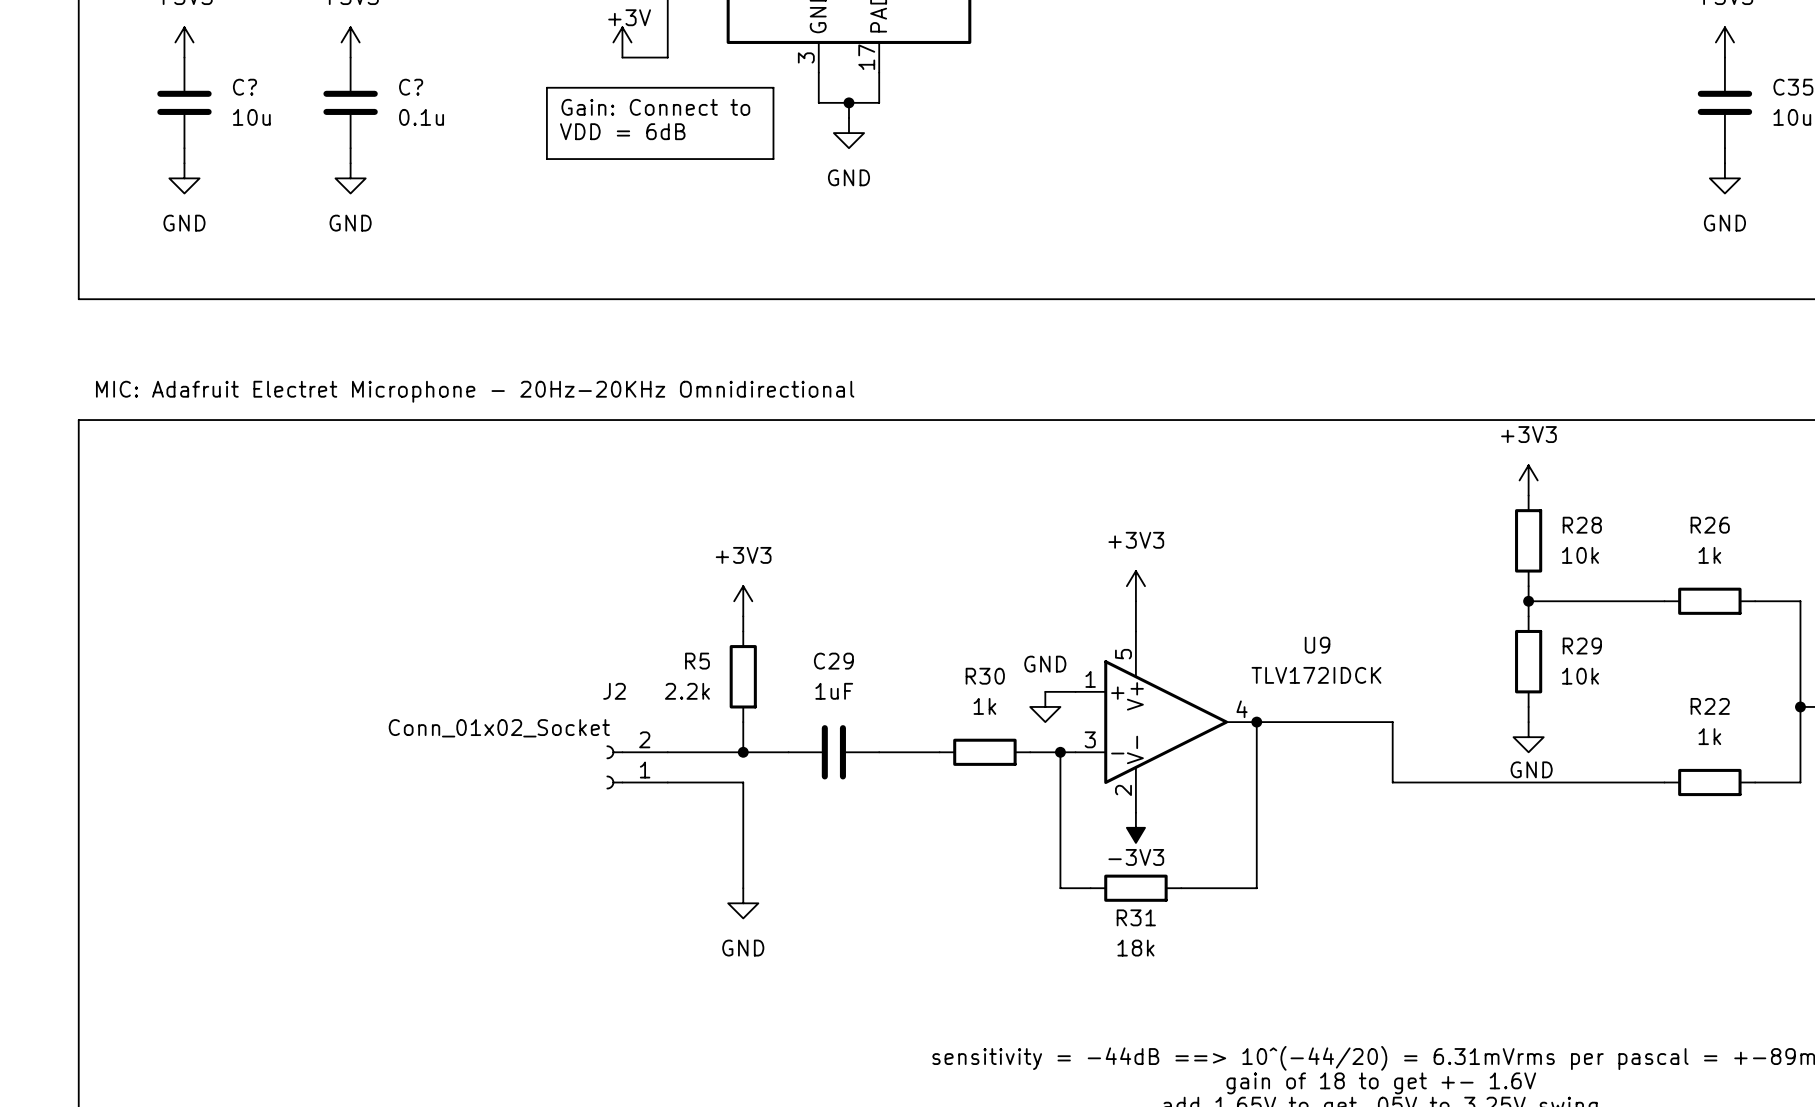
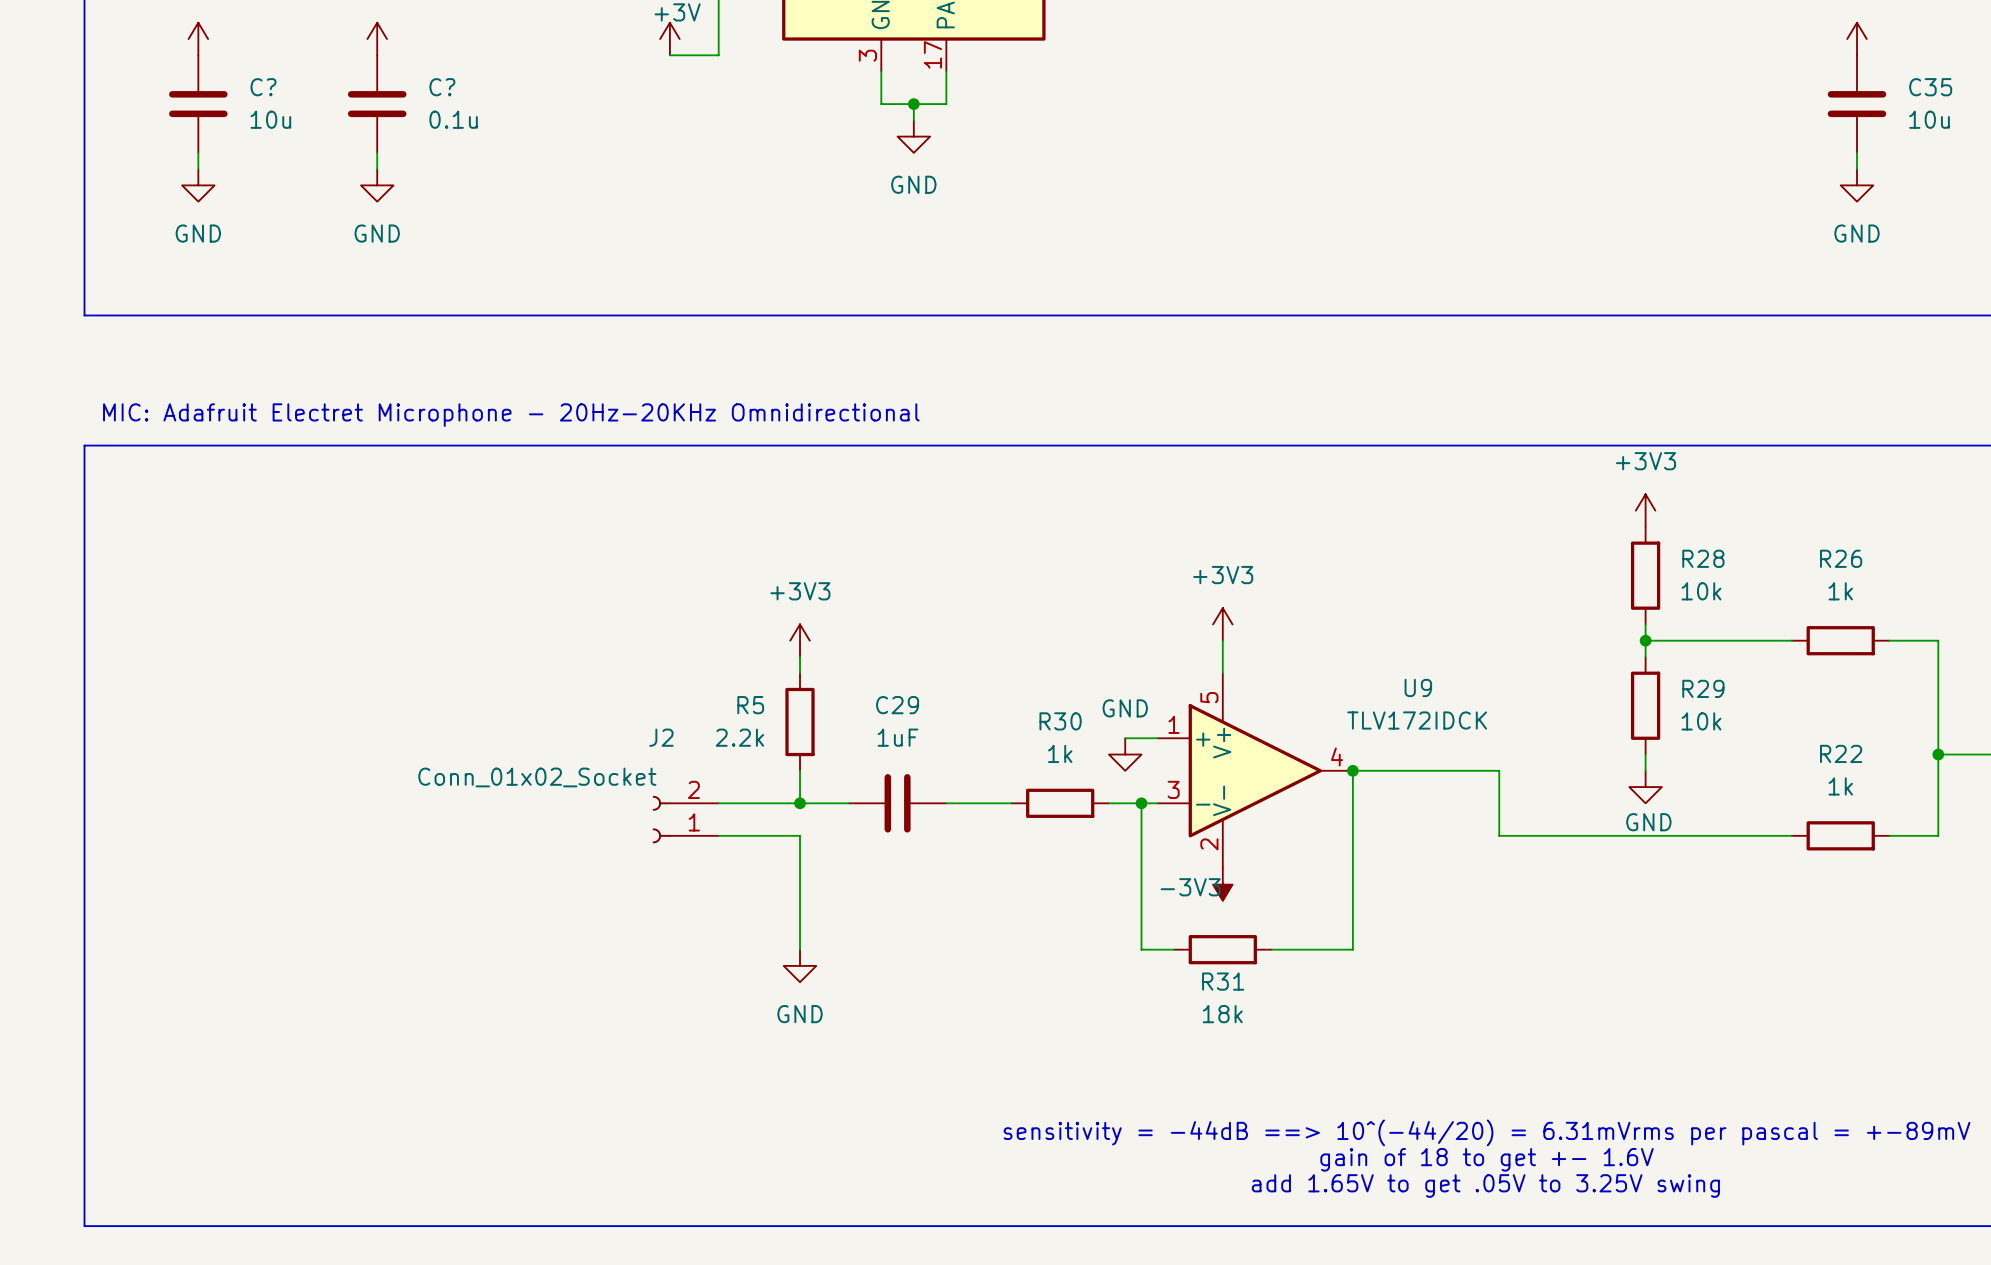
line: (546, 87) (773, 87) (773, 159) (546, 159) (546, 87) -> none
text: Gain: Connect to (655, 107) -> none
text: VDD = 6dB (622, 131) -> none
power symbol text position: -3V3 (1136, 857) -> -3V3 (1190, 887)

